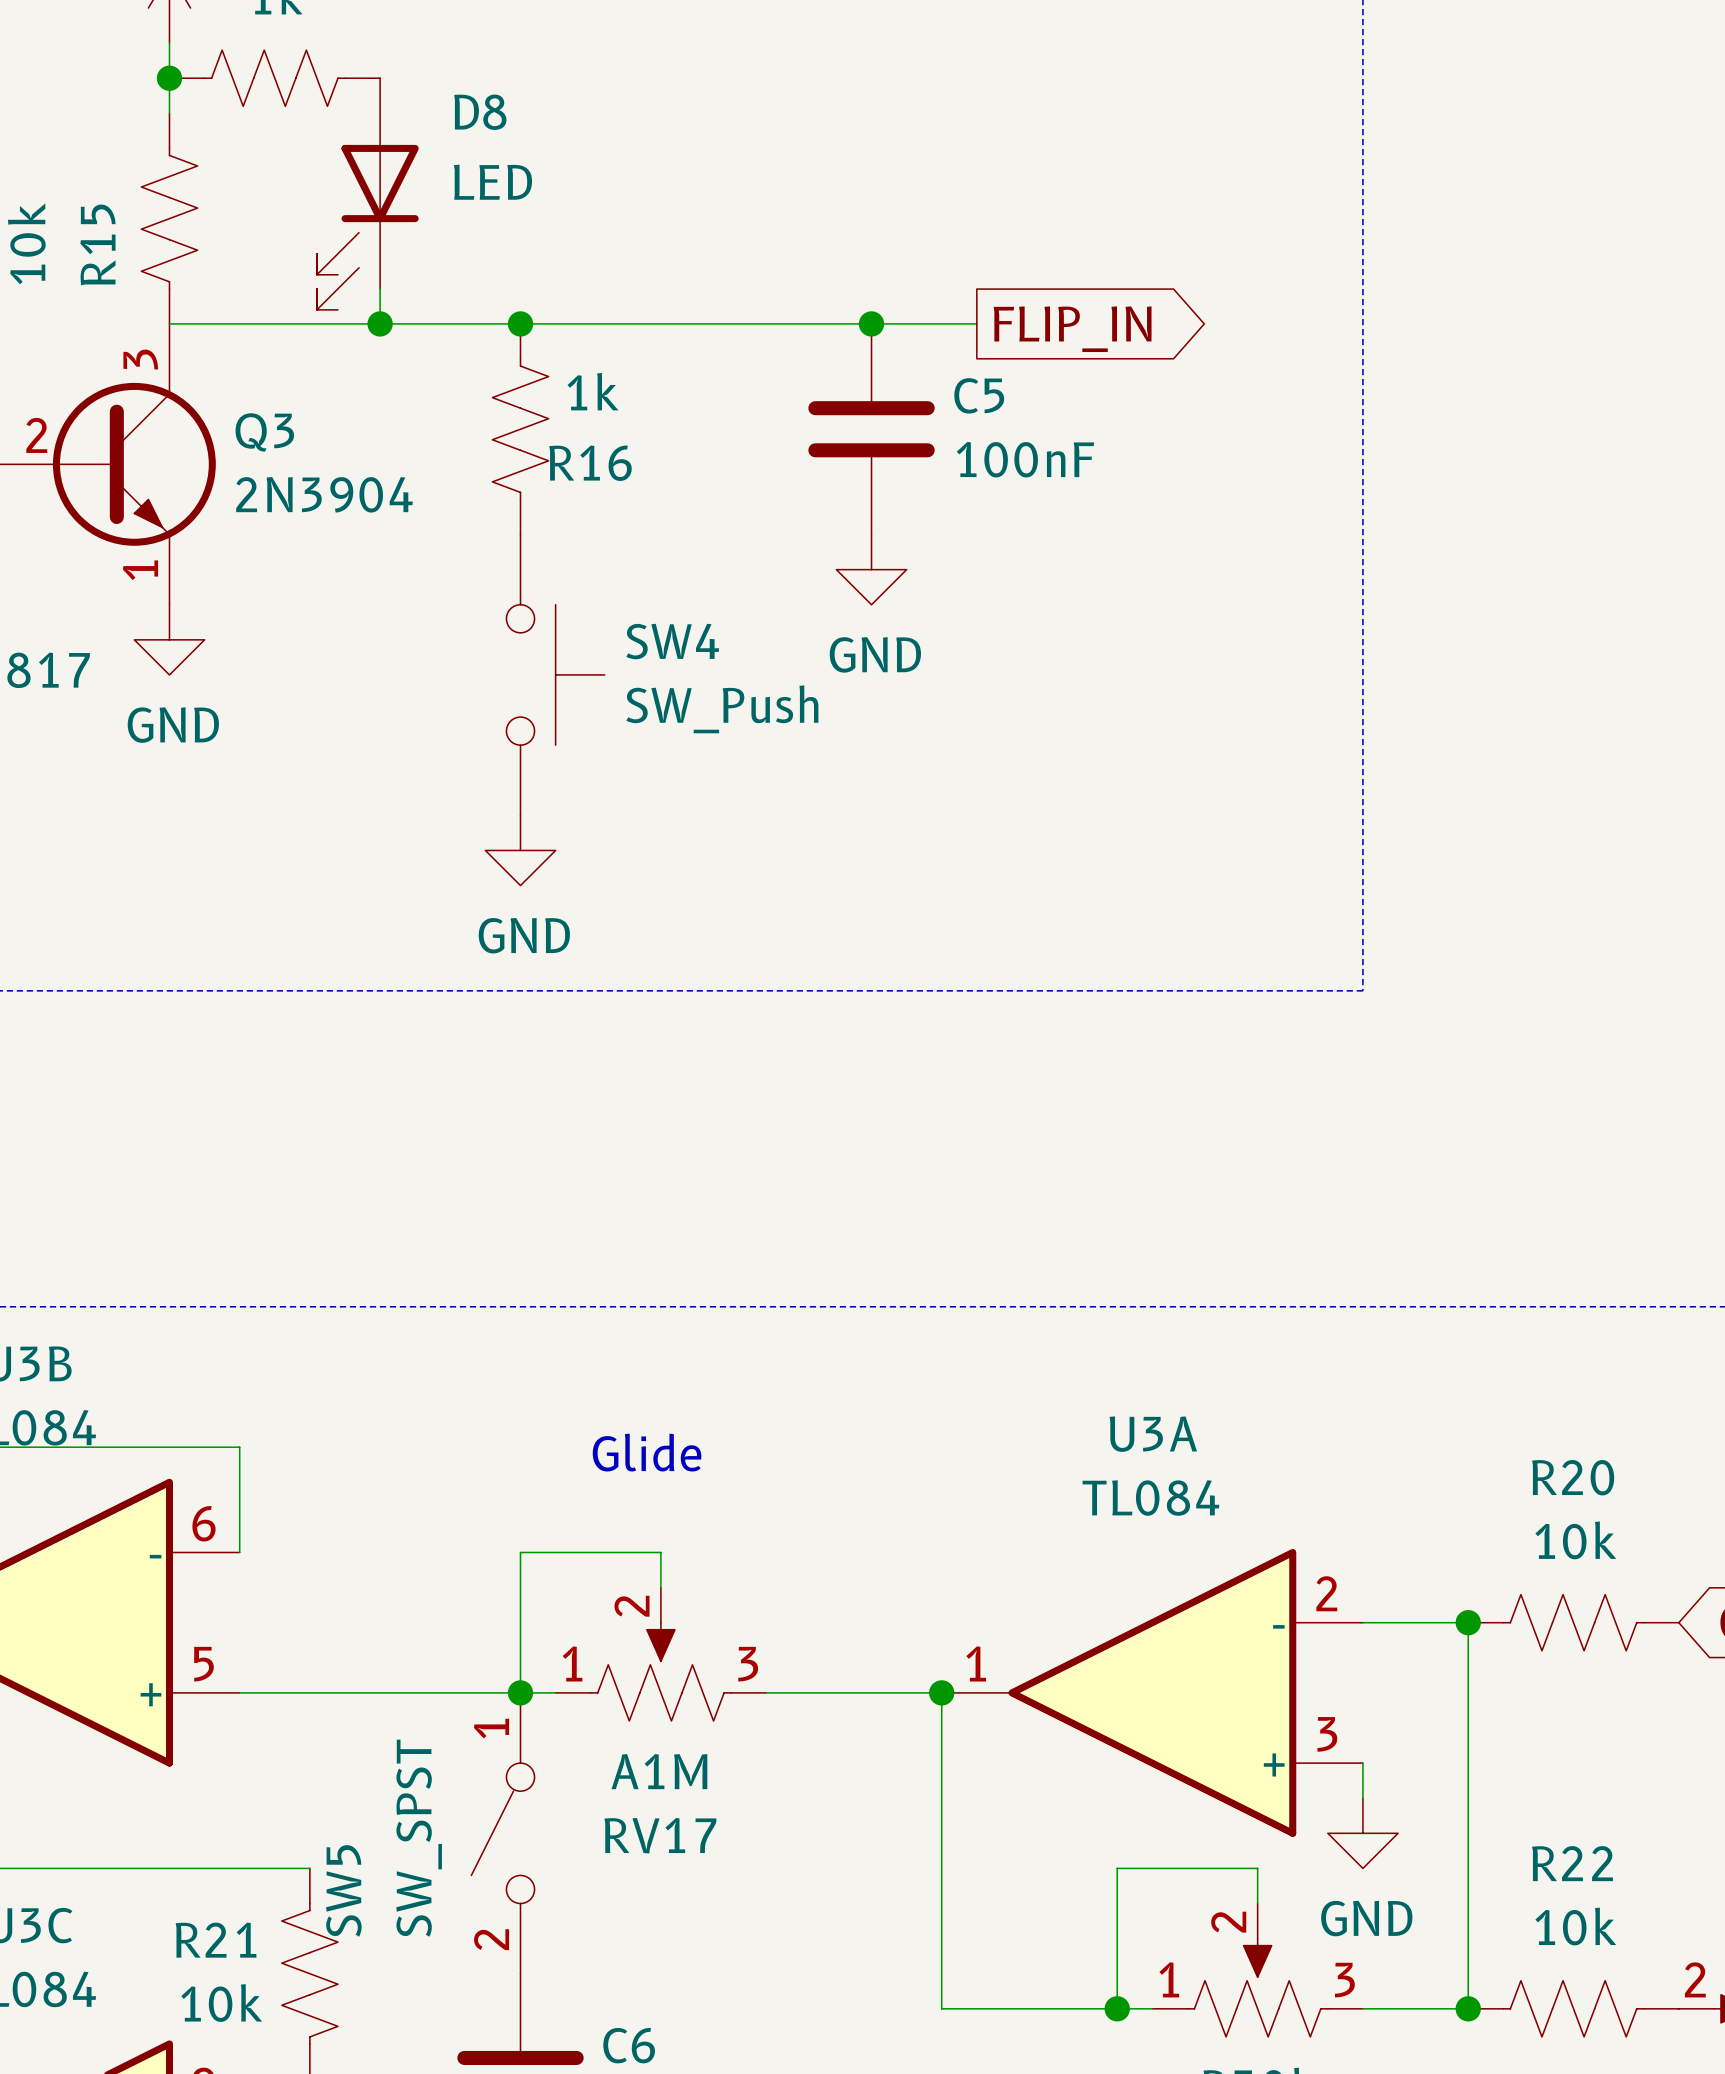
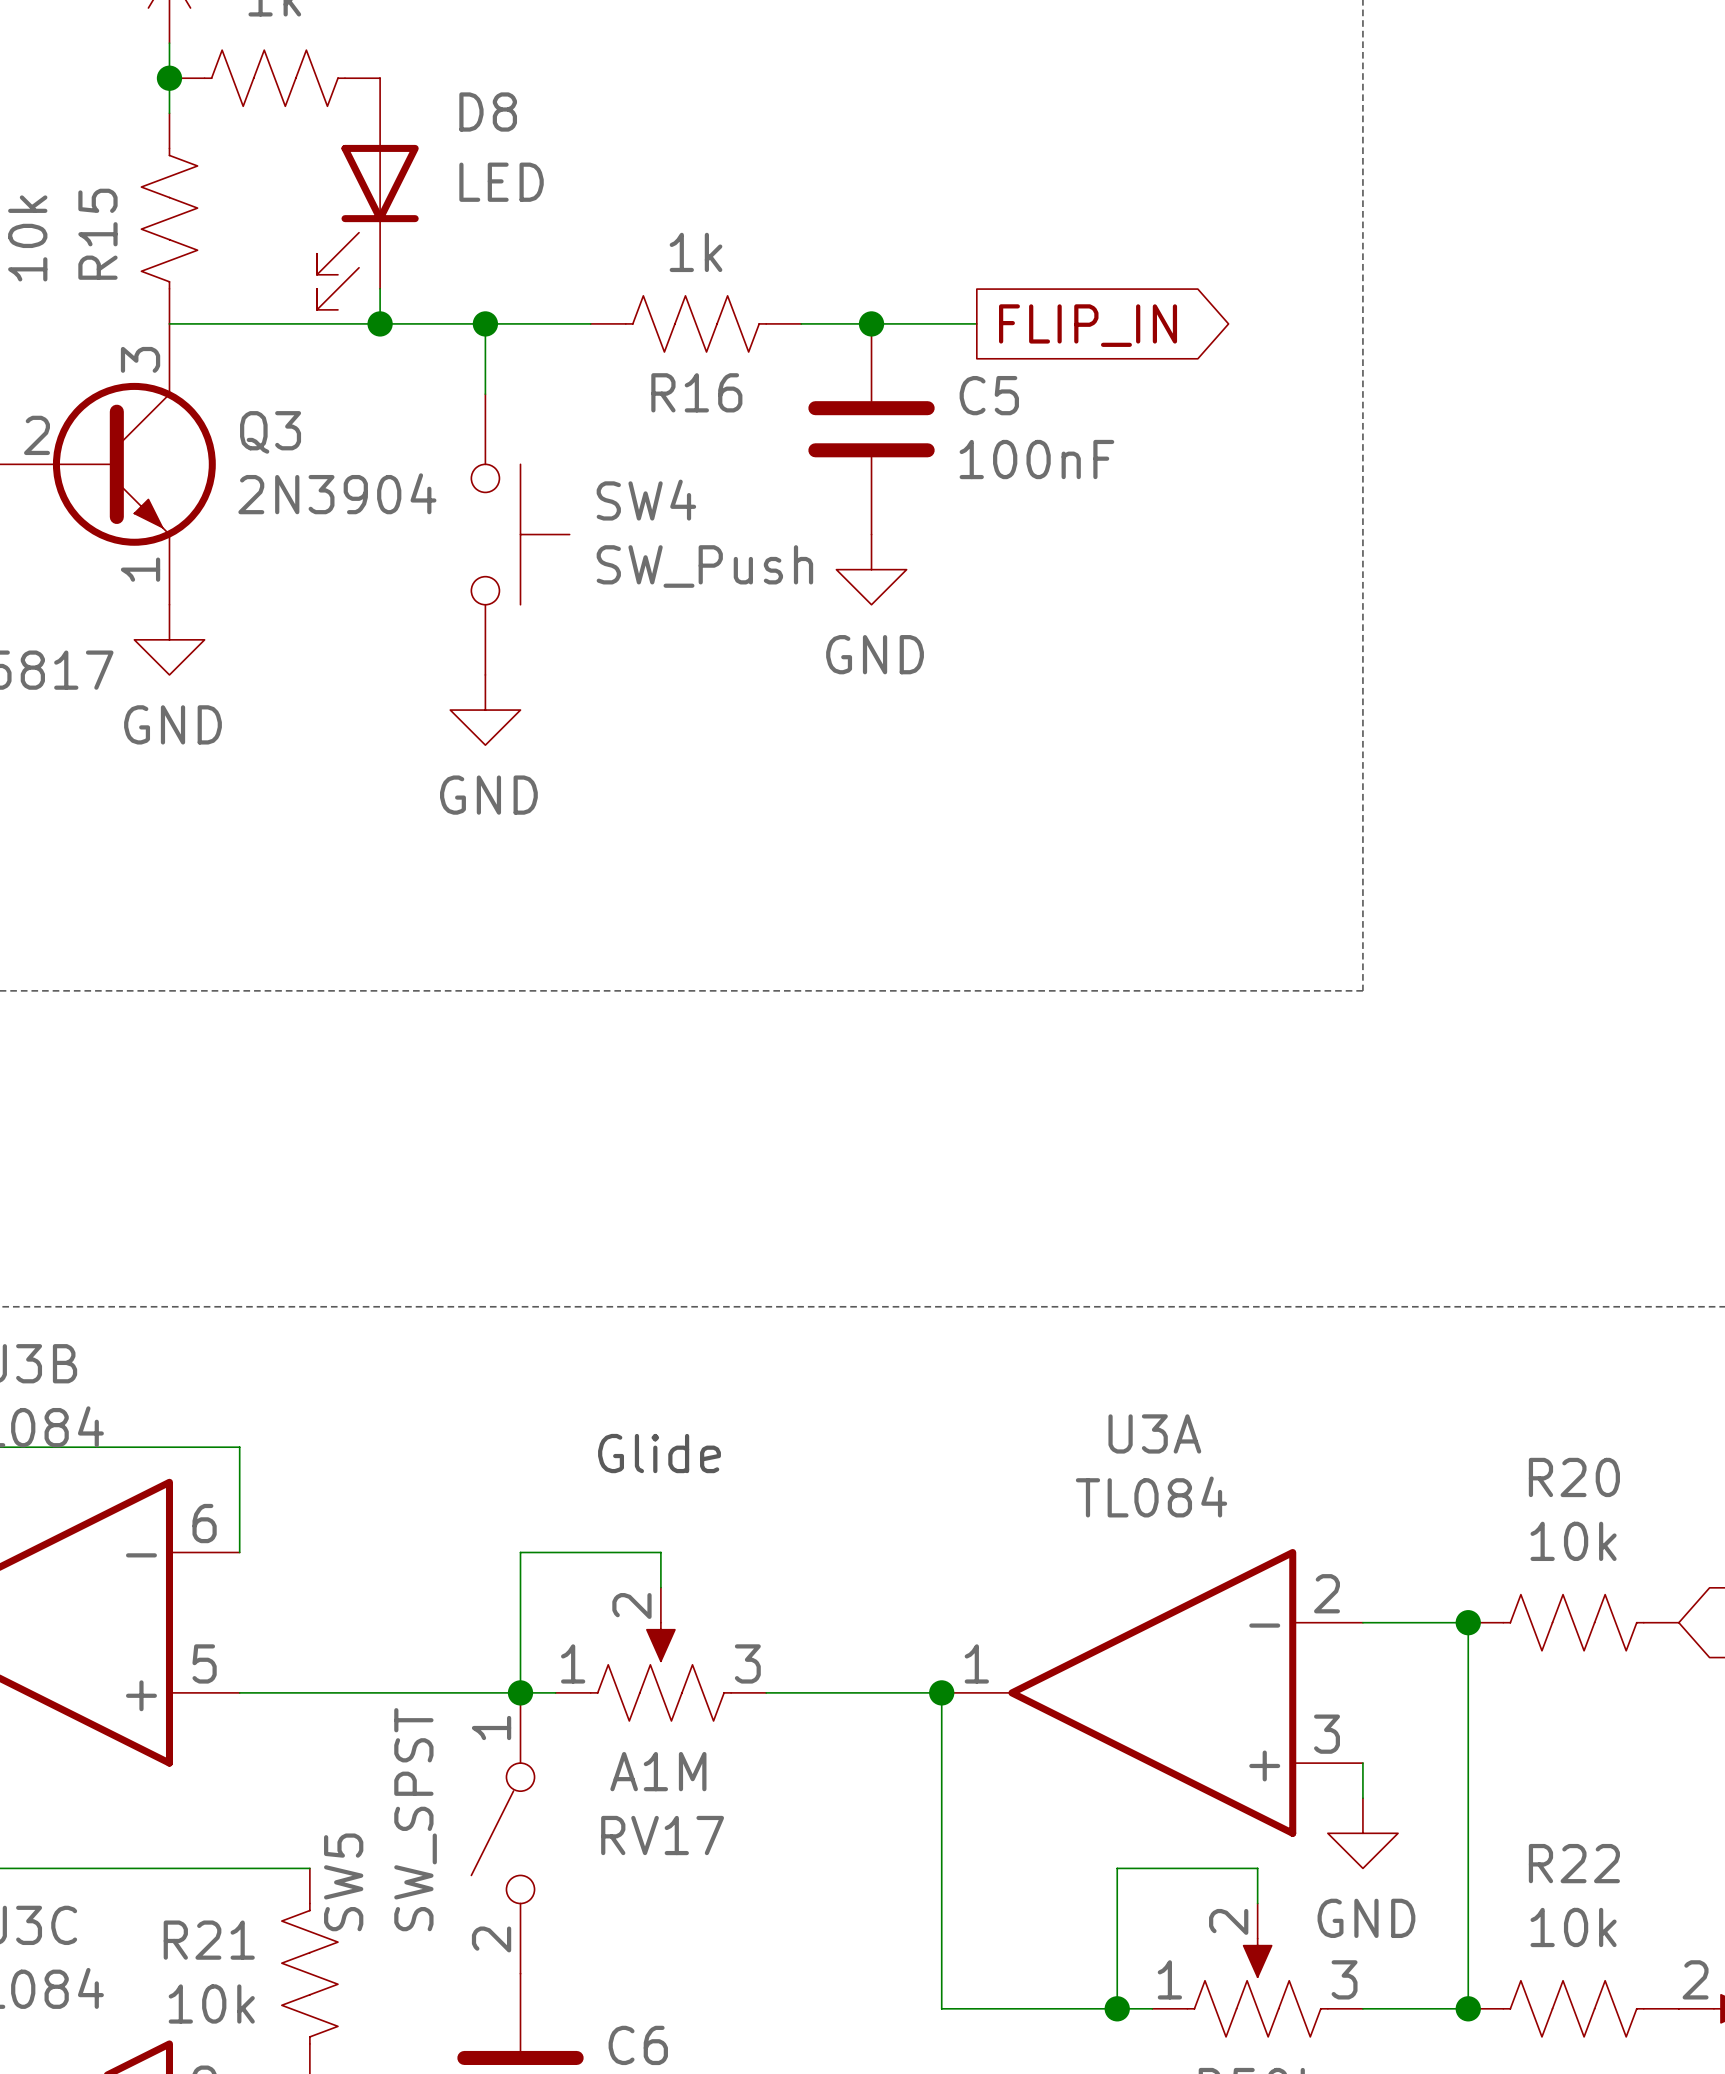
wire: none -> (485, 323) (485, 394)
junction position: (520, 323) -> (485, 323)
wire: (590, 323) (801, 323) -> none
R16 value position: 1k (592, 391) -> 1k (696, 252)
R16 rotation: 0° (520, 429) -> 90° clockwise (696, 323)
R16 position: (520, 429) -> (696, 323)
SW4 position: (555, 674) -> (520, 534)
power symbol position: GND (520, 850) -> GND (485, 710)

